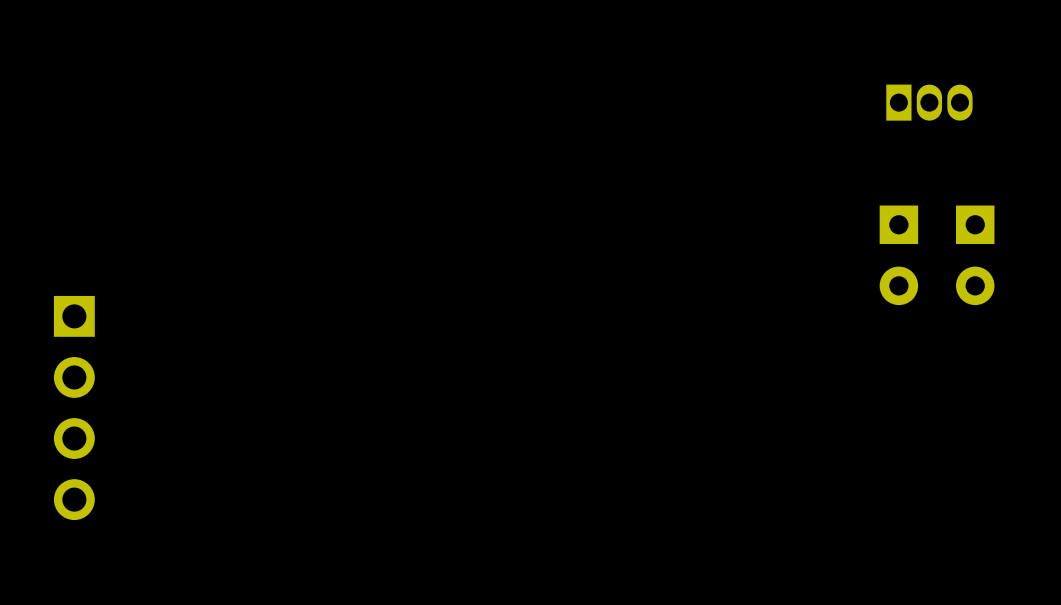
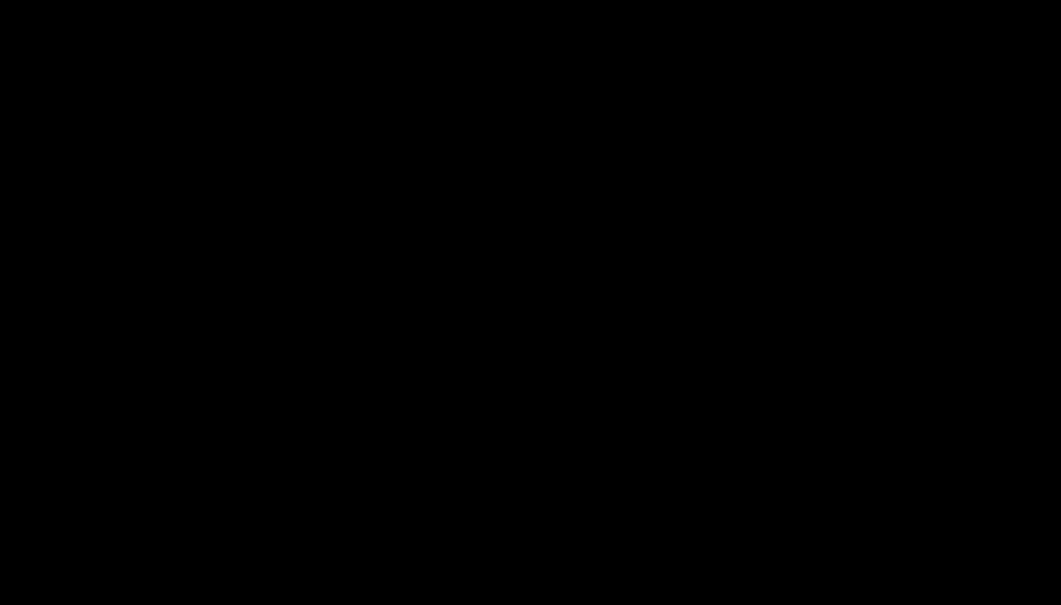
part: (929, 102) -> none
part: (898, 255) -> none
part: (975, 255) -> none
part: (74, 408) -> none

